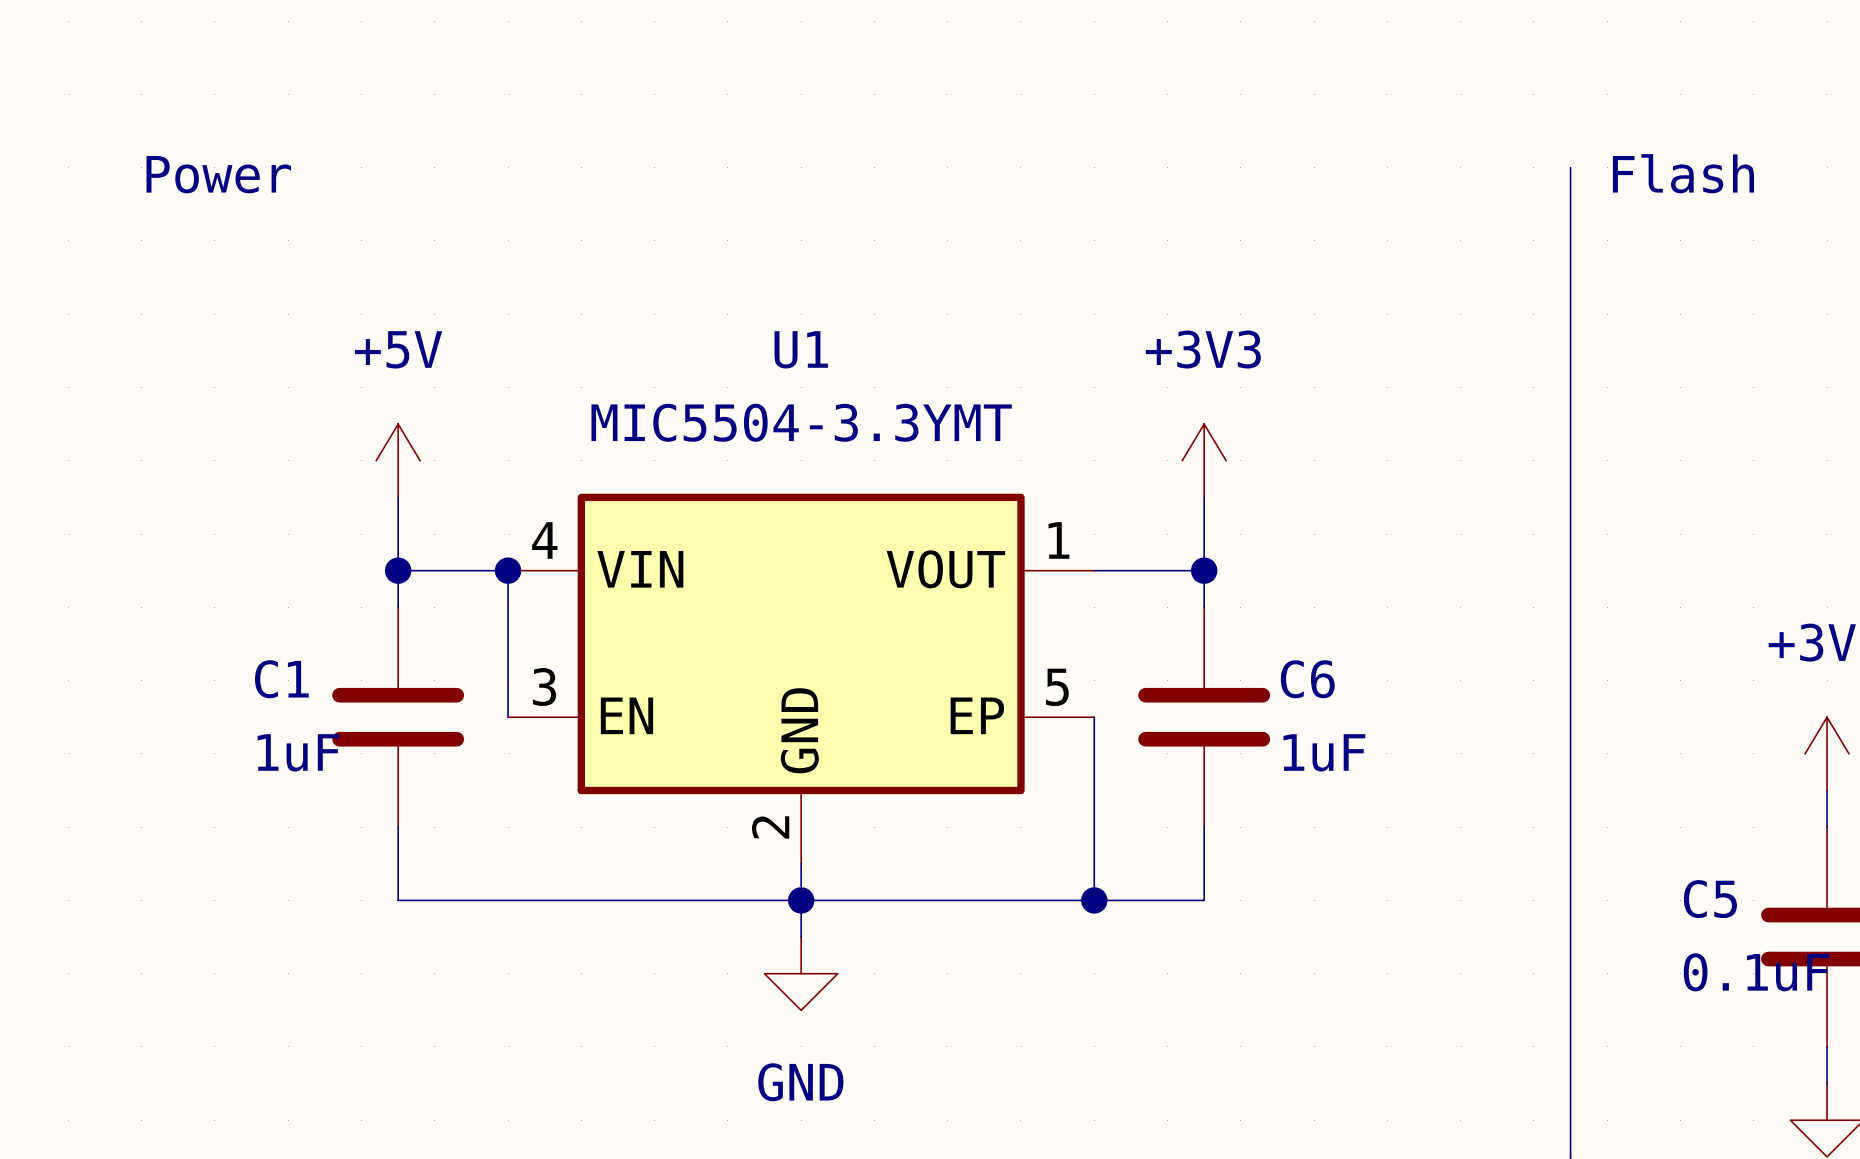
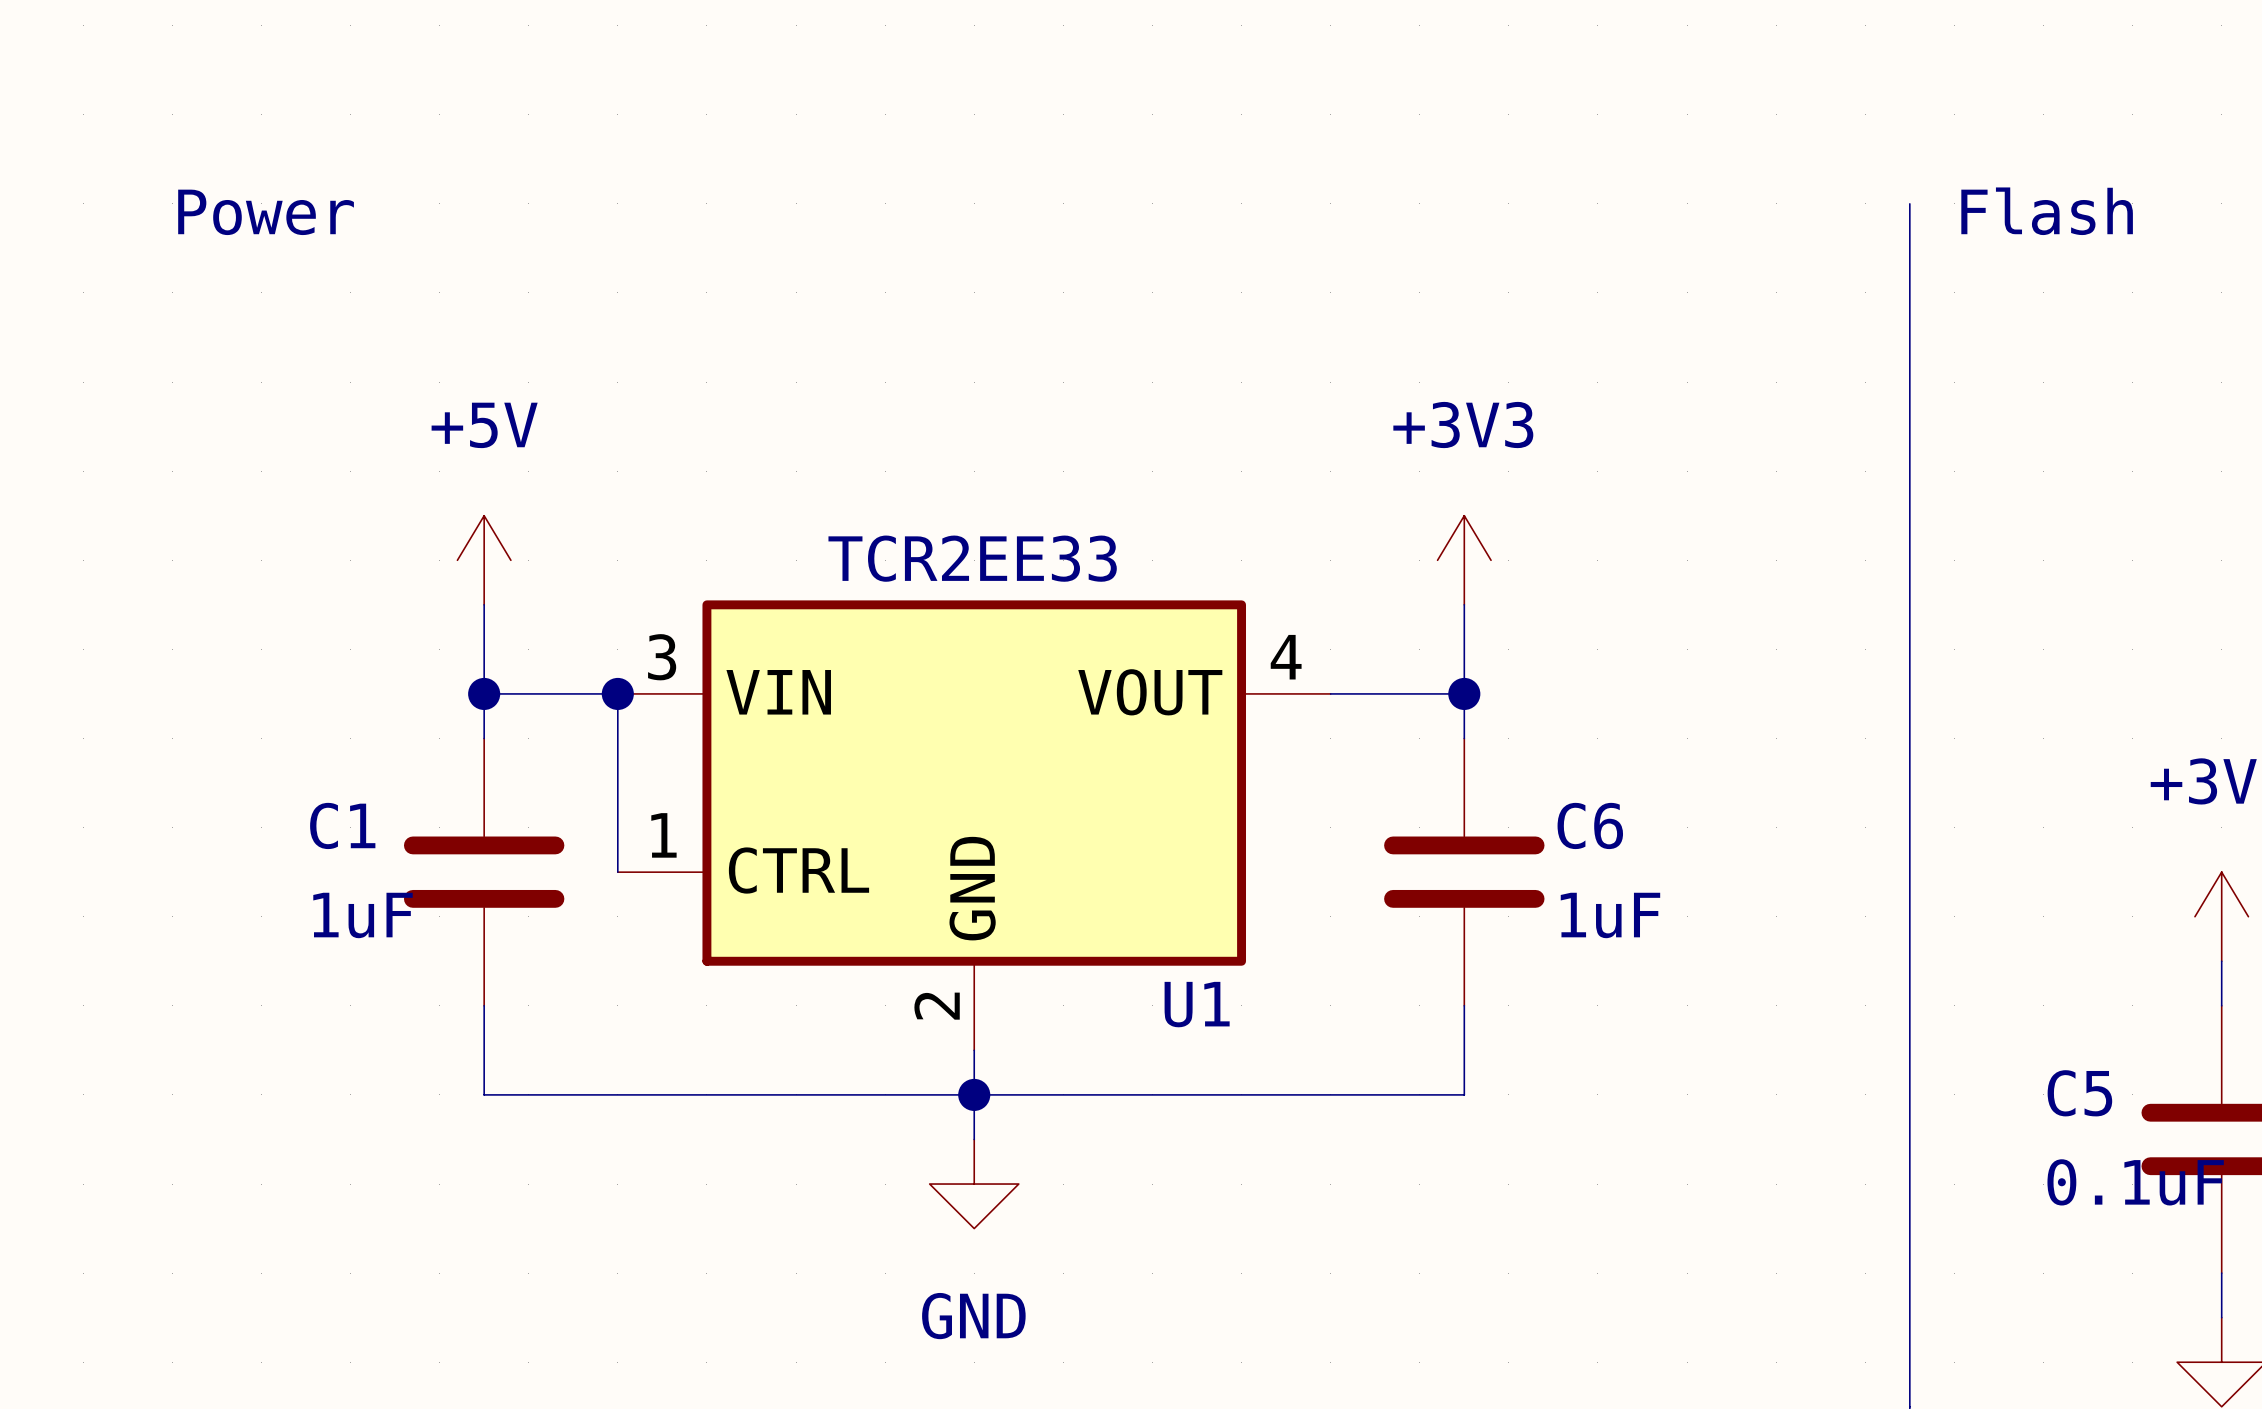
U1 name position: U1 (801, 349) -> U1 (1197, 1004)
U1 value: MIC5504-3.3YMT (801, 422) -> TCR2EE33 (972, 558)
U1 symbol: [508, 493, 1095, 864] -> [617, 600, 1331, 1051]
wire: (1094, 717) (1094, 900) -> none
junction: (1094, 900) -> none

